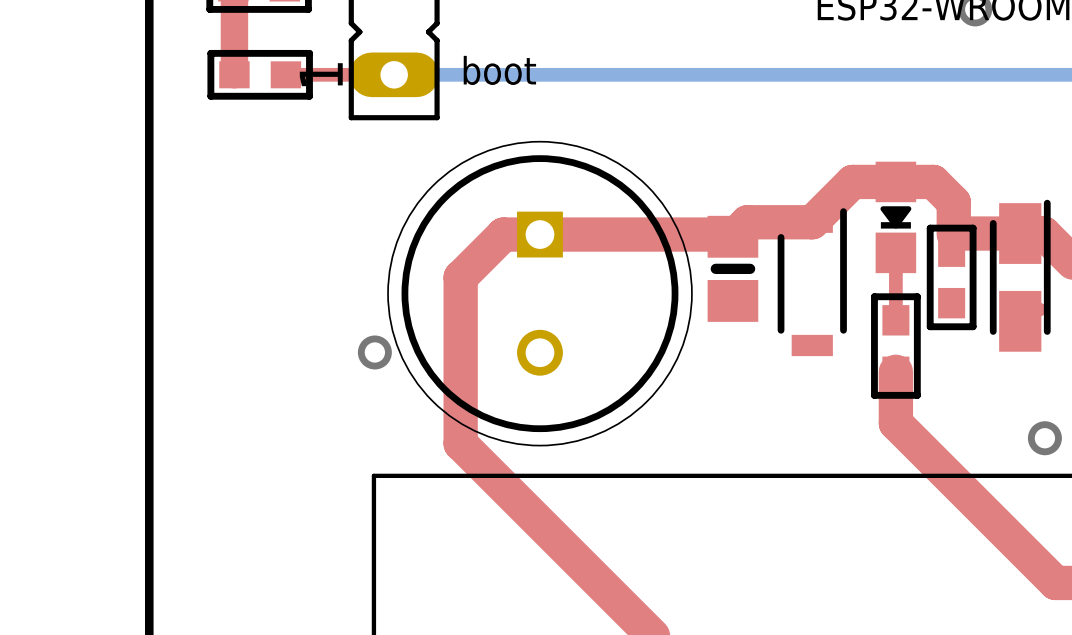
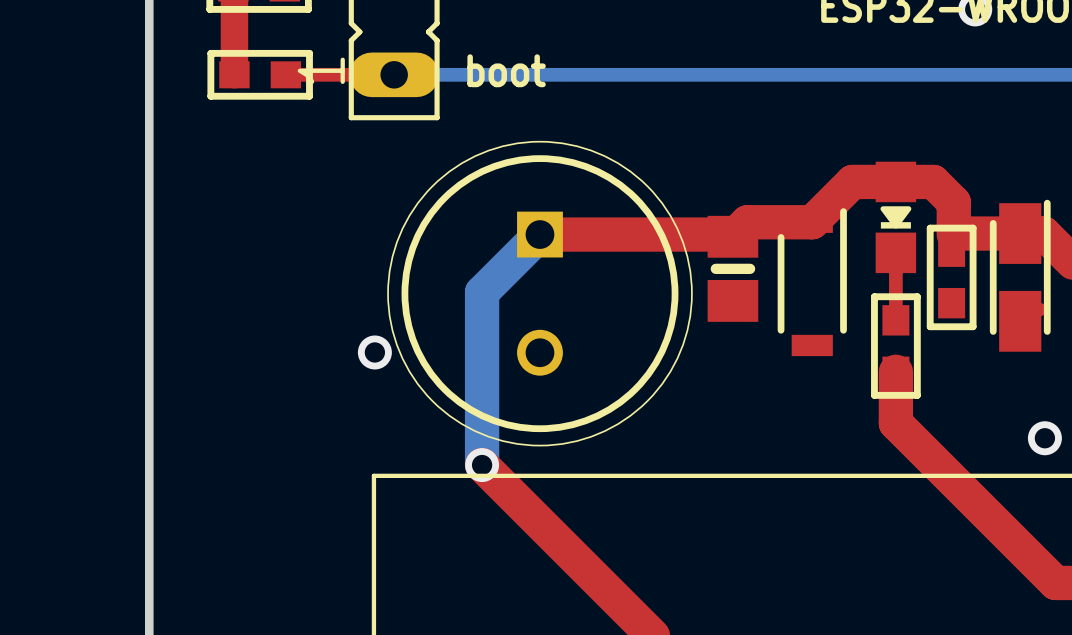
top track: (539, 234) (503, 234) (460, 277) (460, 443) (482, 465) -> none
bottom track: none -> (539, 234) (482, 292) (482, 465)
via: none -> (482, 465)

